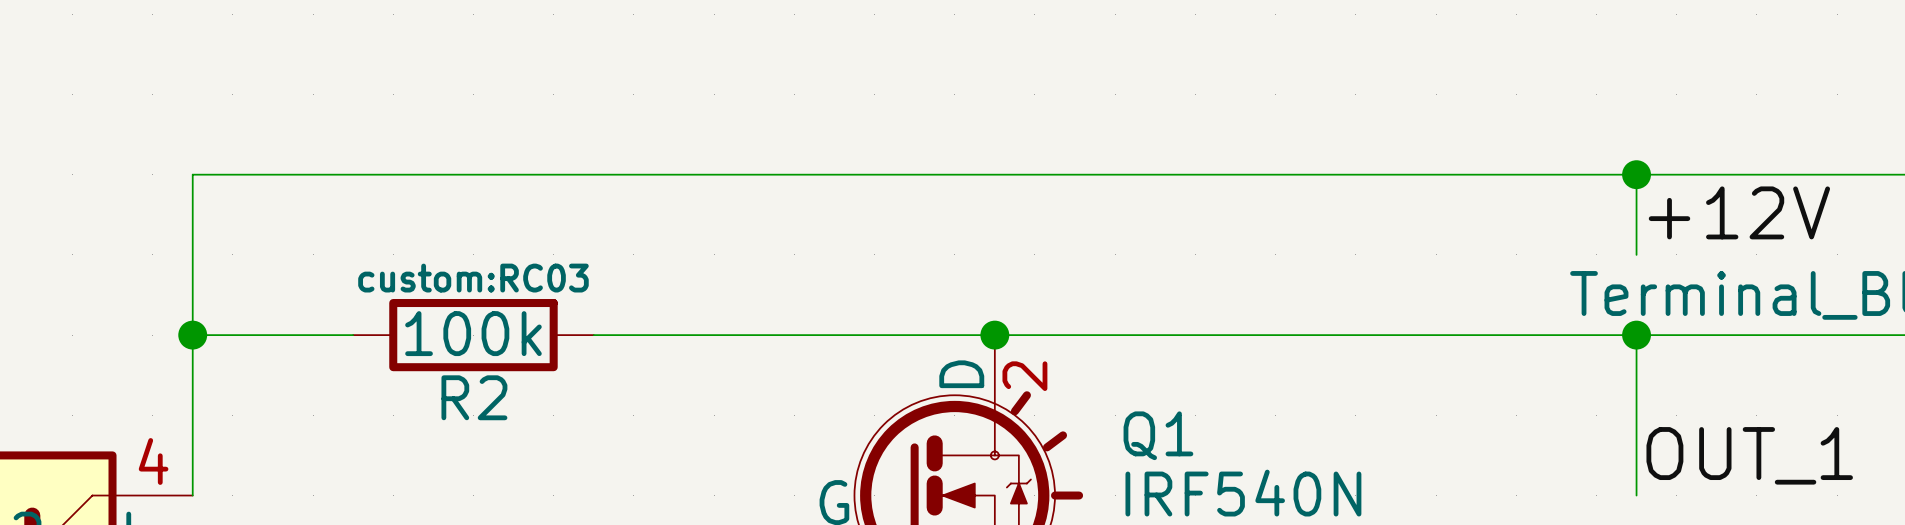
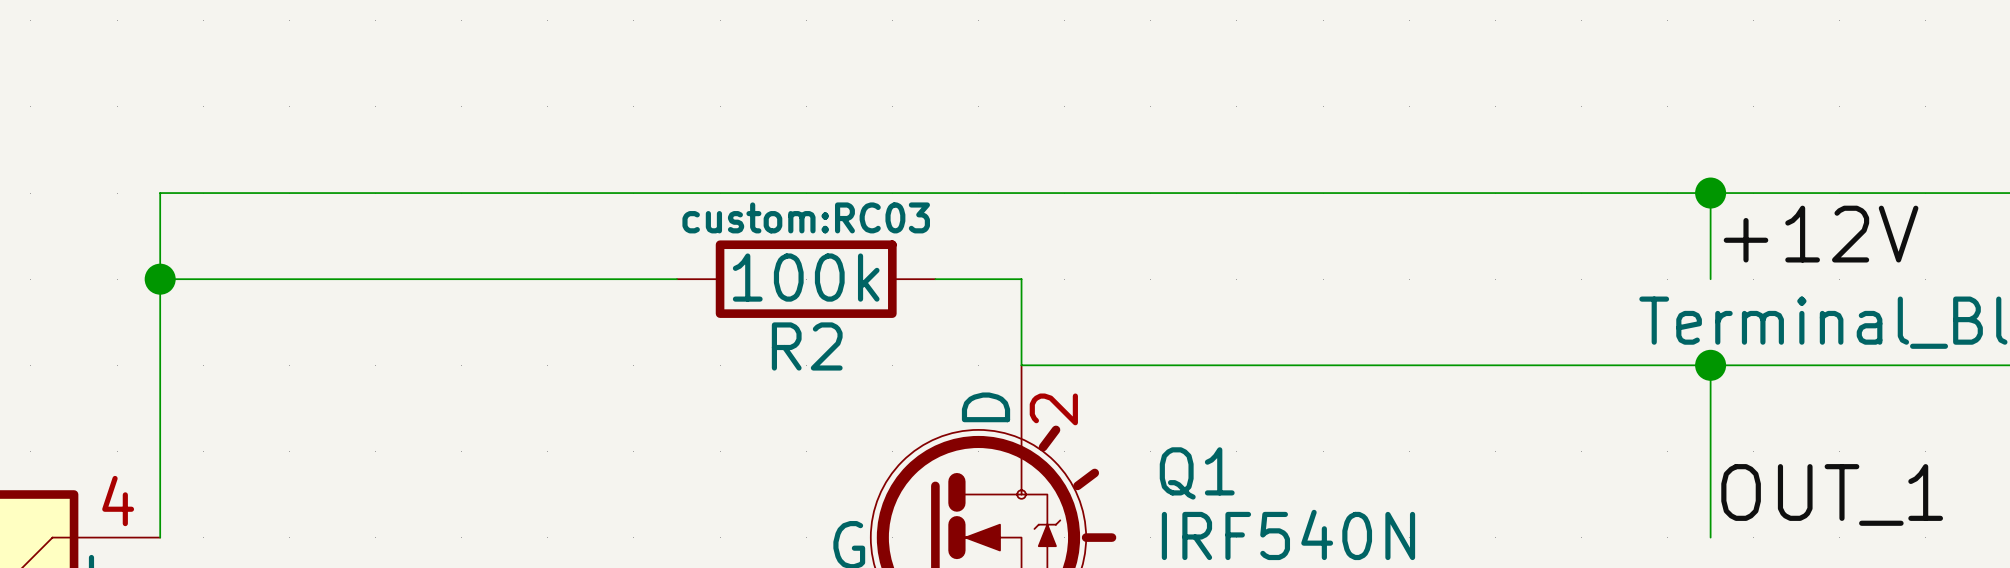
wire: none -> (160, 279) (676, 279)
wire: (192, 335) (353, 335) -> none
junction position: (192, 335) -> (160, 279)
R2 position: (473, 335) -> (806, 279)
wire: (593, 335) (994, 335) -> (935, 279) (1021, 279) (1021, 365)
junction: (994, 335) -> none

